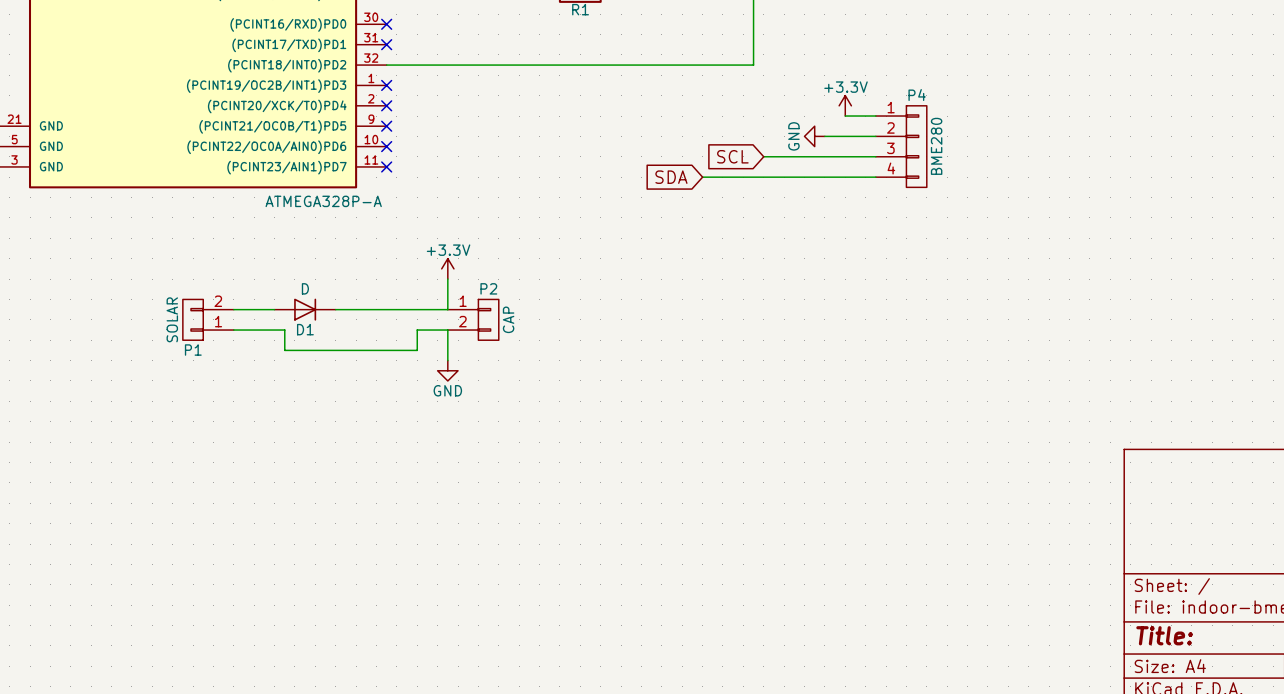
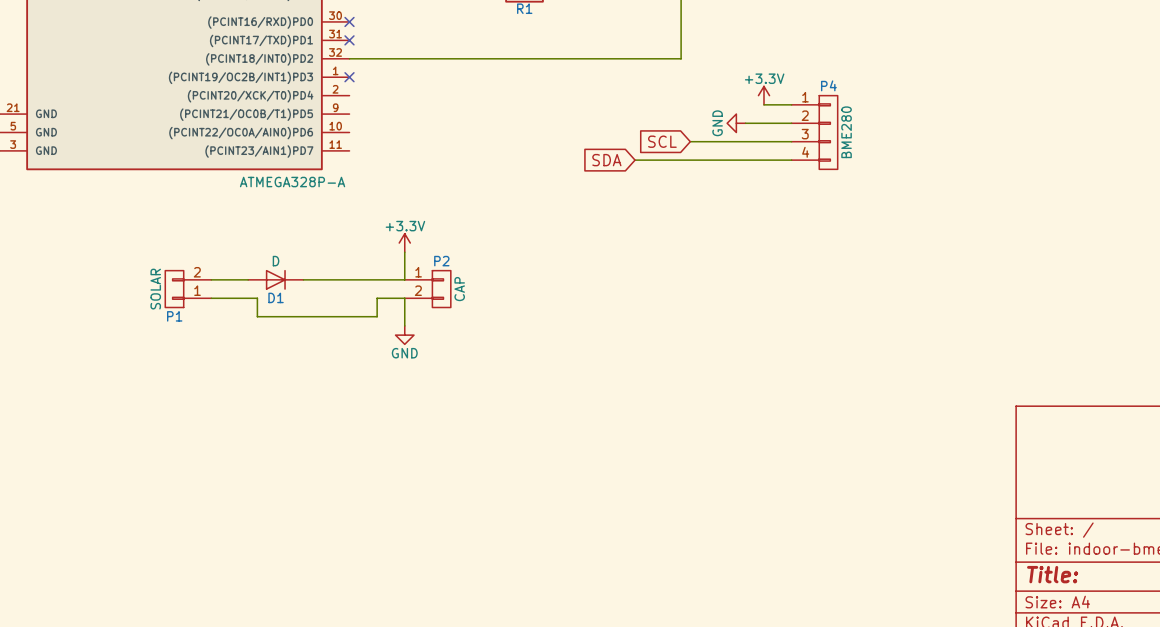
no-connect mark: (386, 105) -> none
no-connect mark: (386, 126) -> none
no-connect mark: (386, 146) -> none
no-connect mark: (386, 166) -> none

